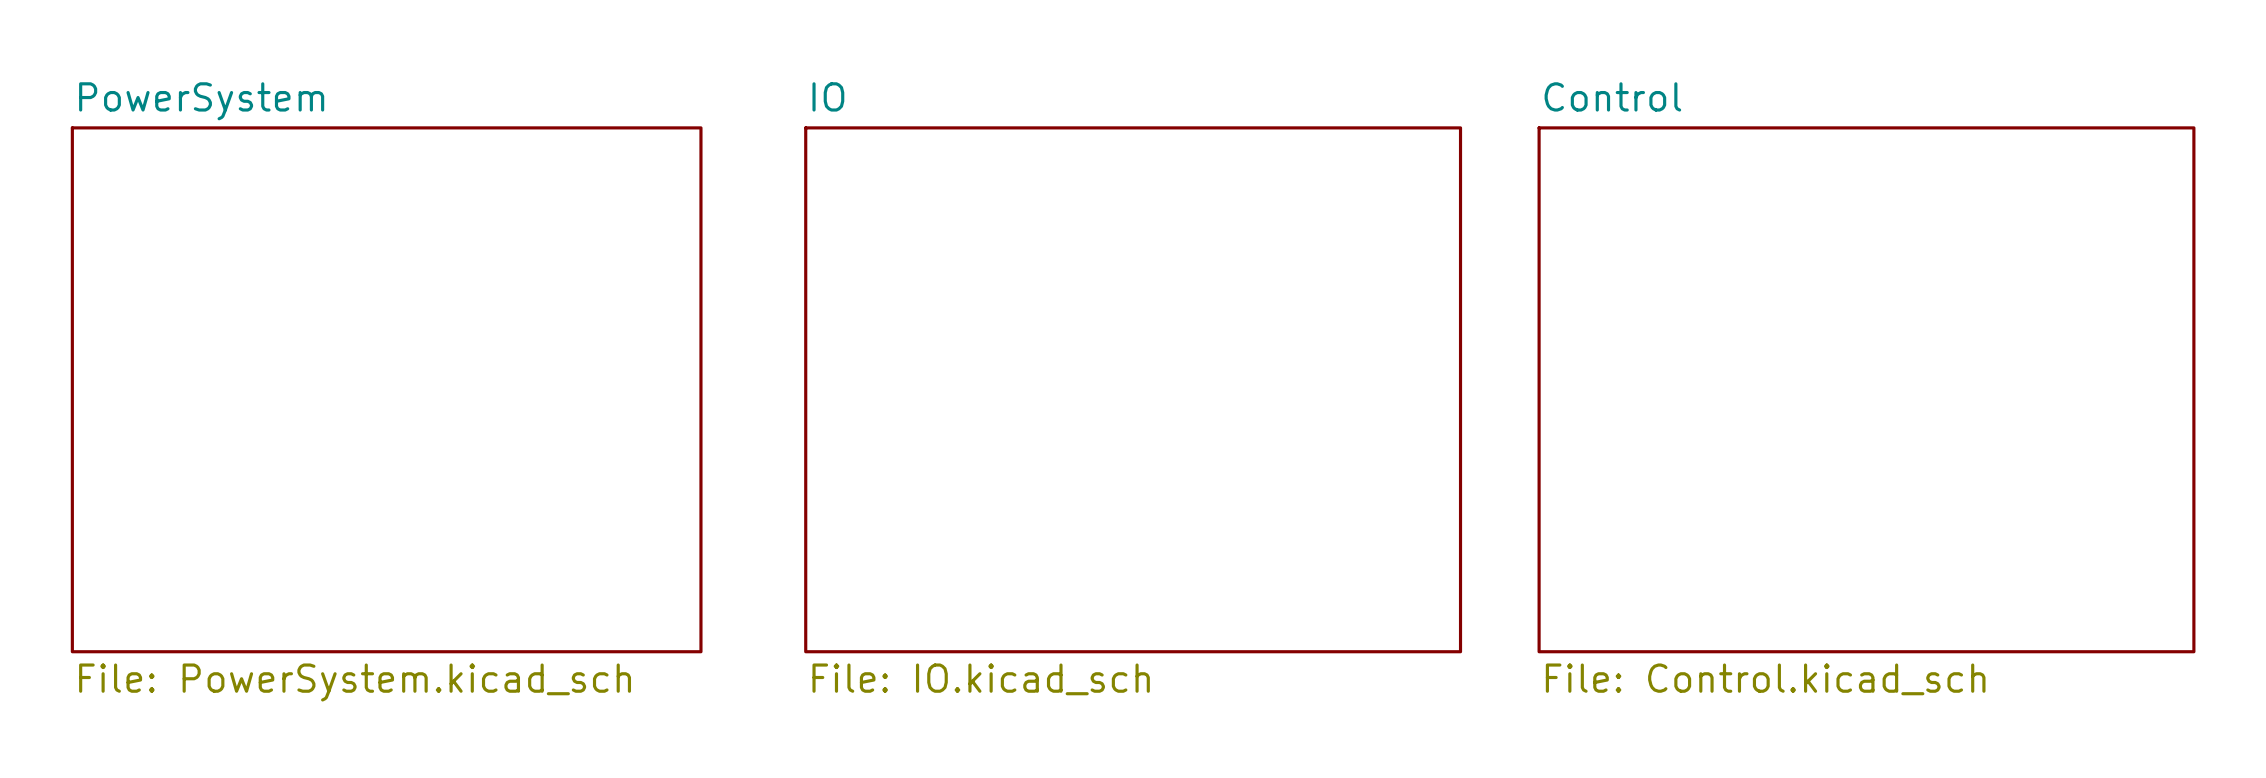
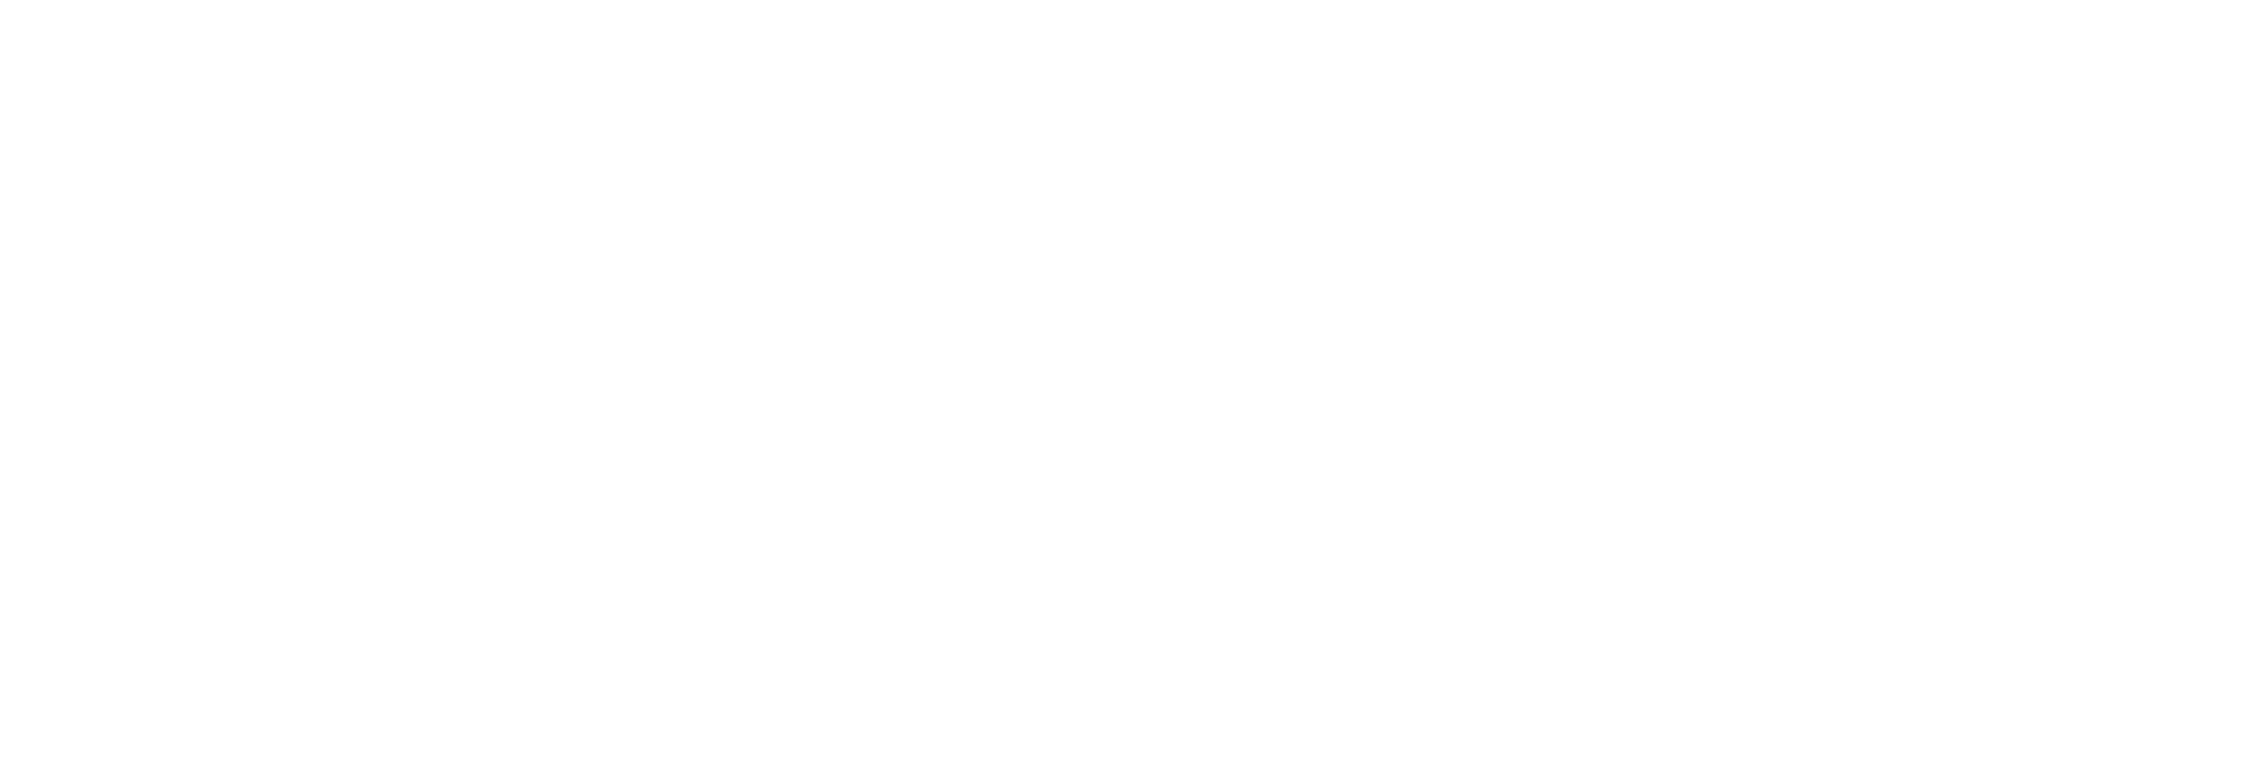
sheet PowerSystem: File: PowerSystem.kicad_sch (386, 389) -> none
sheet IO: File: IO.kicad_sch (1133, 389) -> none
sheet Control: File: Control.kicad_sch (1866, 389) -> none

